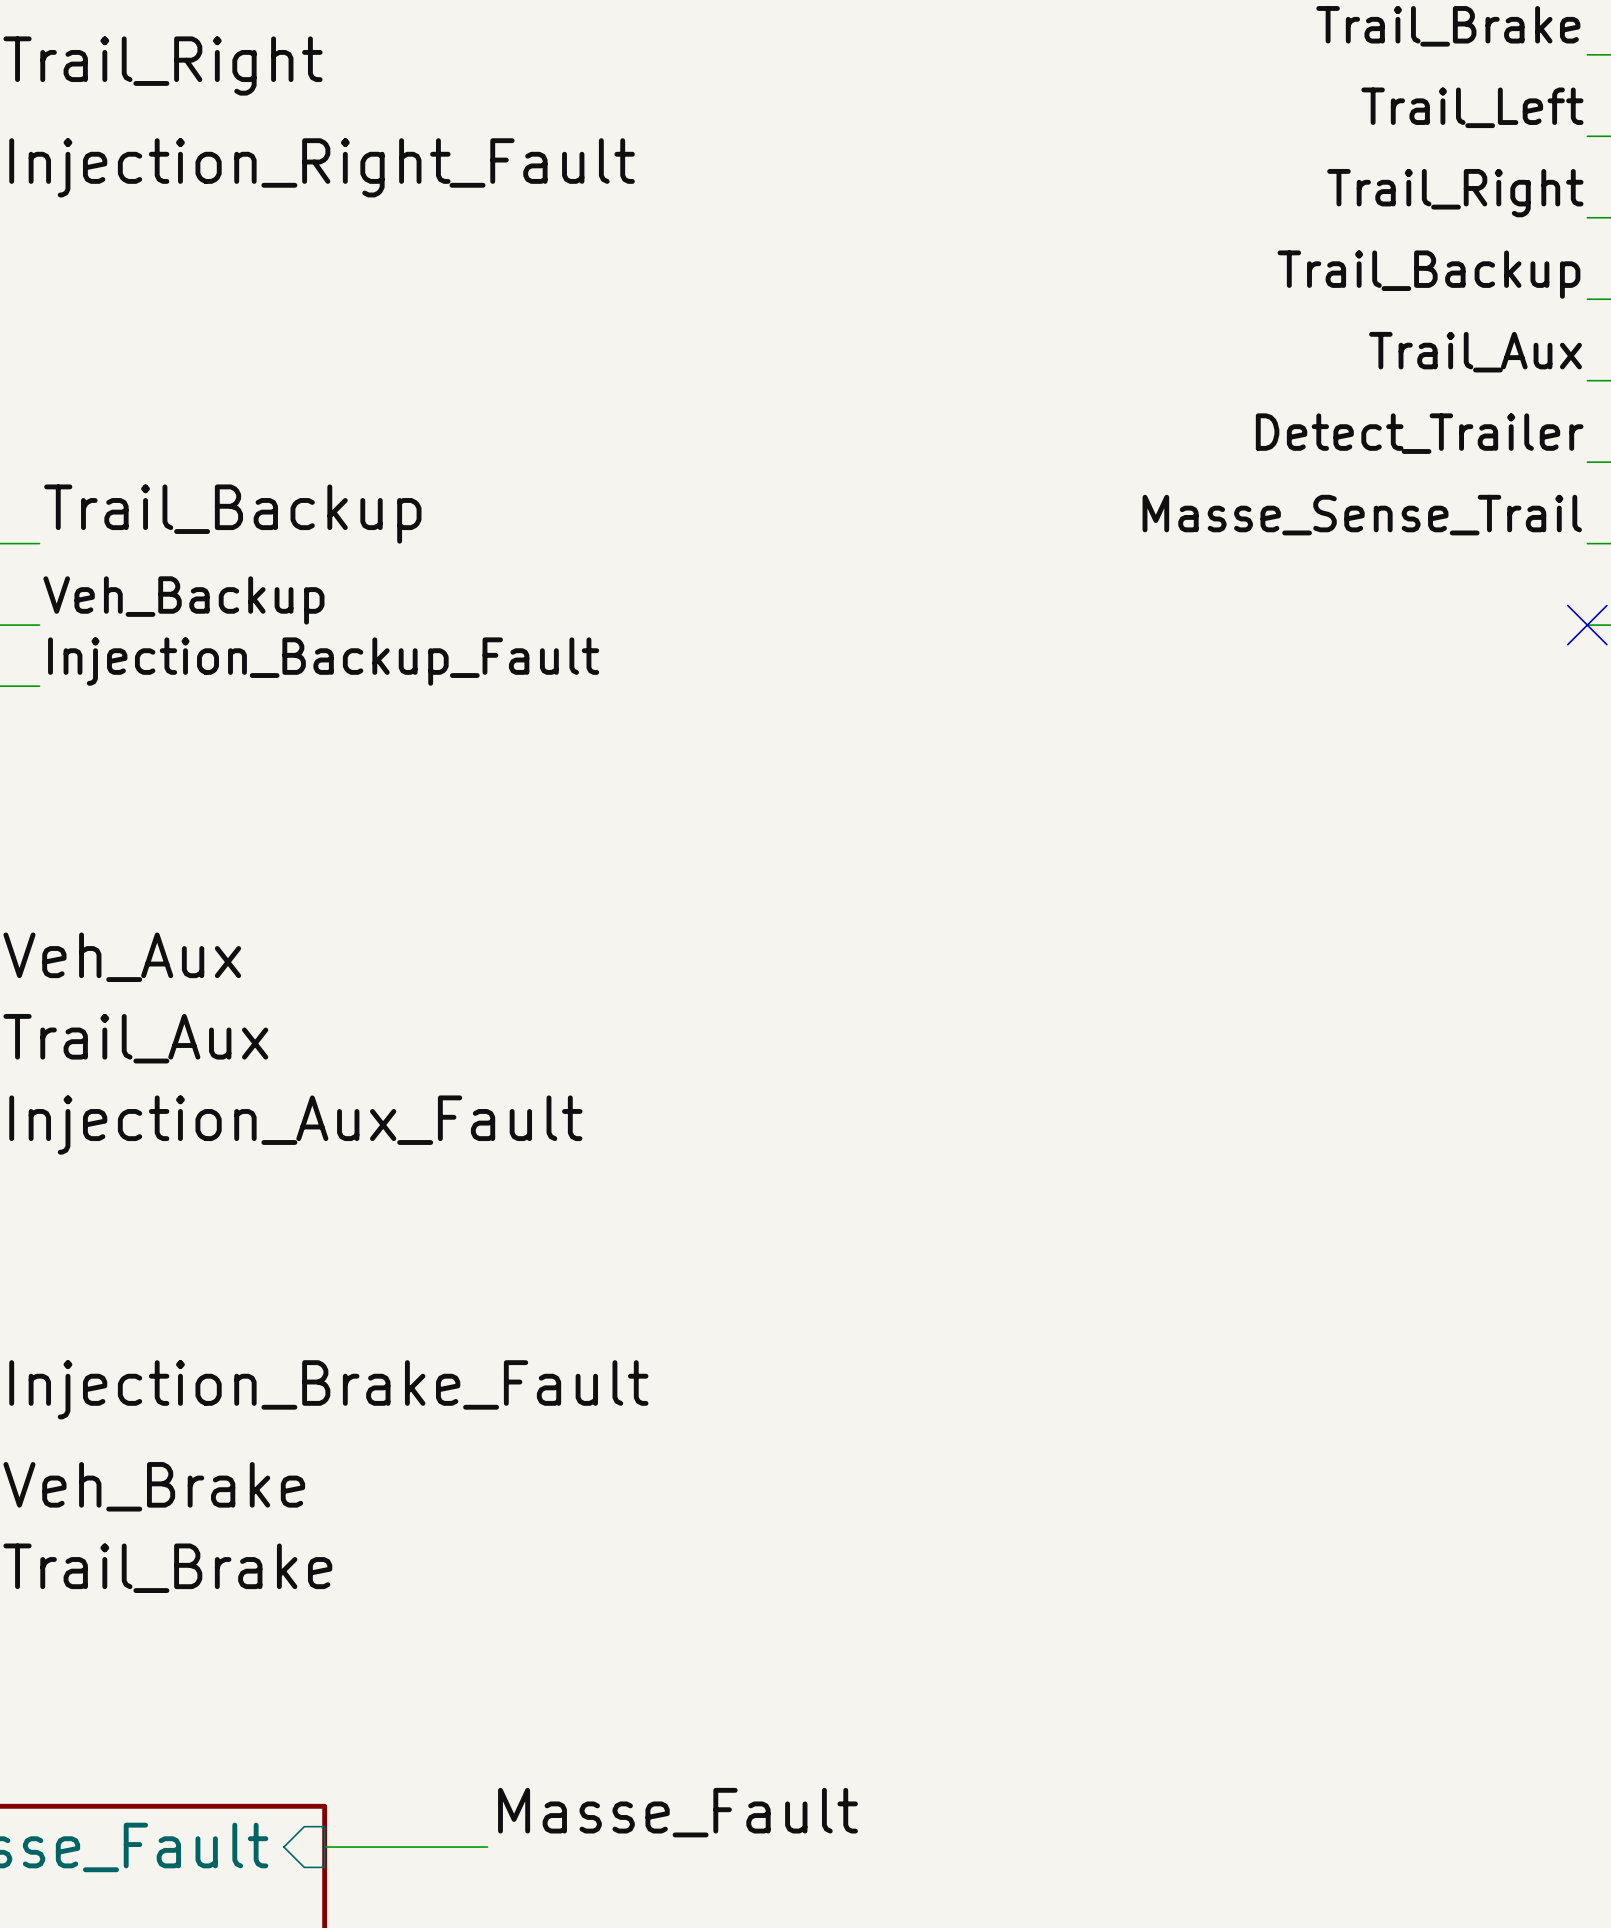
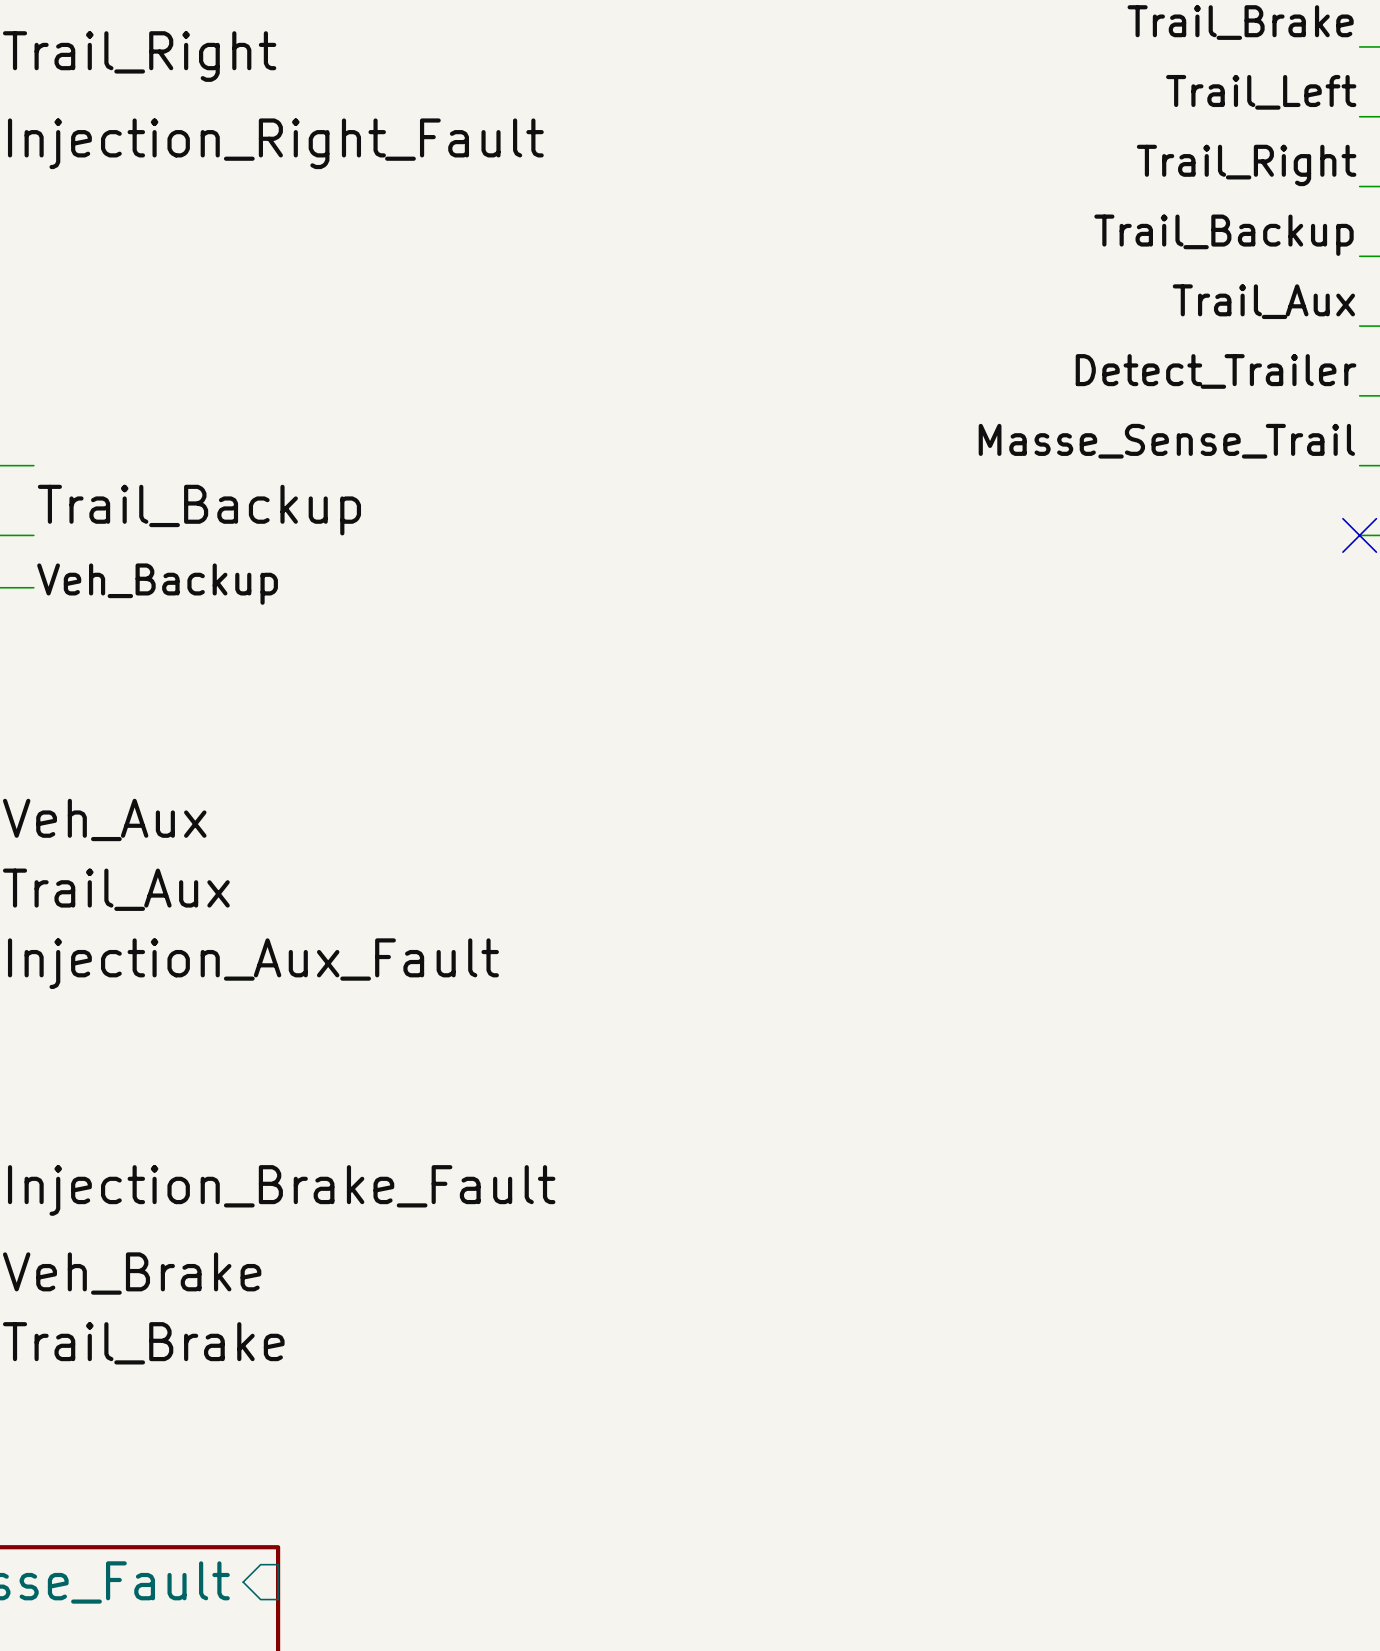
label: Trail_Backup (232, 514) -> none
label: Veh_Backup (183, 600) -> Trail_Backup (199, 510)
label: Injection_Backup_Fault (323, 661) -> Veh_Backup (157, 584)
label: Masse_Fault (677, 1812) -> none
wire: (324, 1847) (487, 1847) -> none

